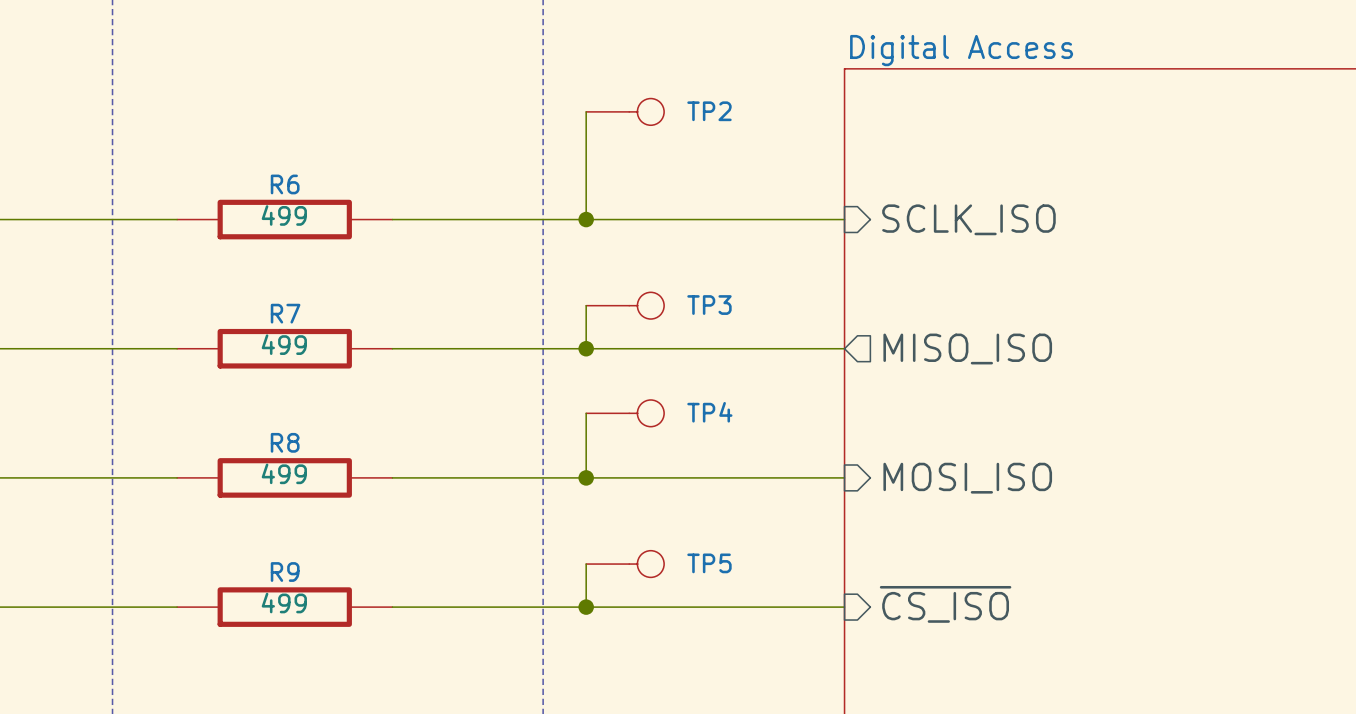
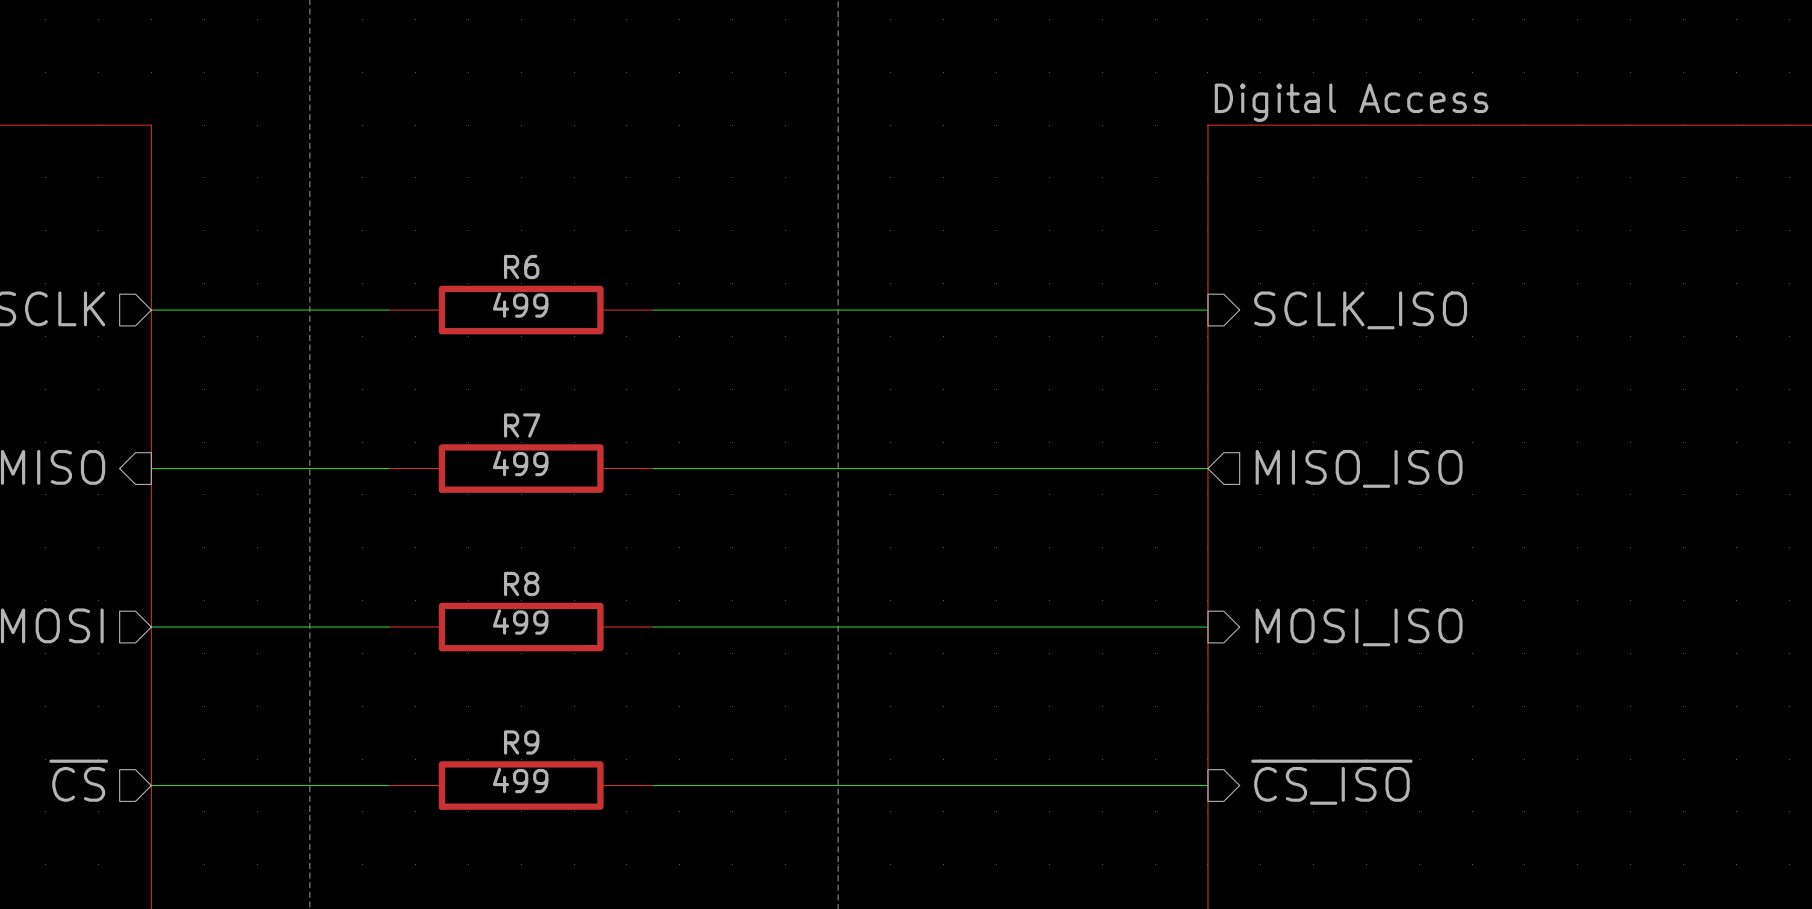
wire: (586, 111) (586, 219) -> none
TP2: (625, 111) -> none
junction: (586, 219) -> none
wire: (586, 305) (586, 348) -> none
TP3: (625, 305) -> none
junction: (586, 348) -> none
wire: (586, 413) (586, 477) -> none
TP4: (625, 413) -> none
junction: (586, 477) -> none
wire: (586, 564) (586, 607) -> none
TP5: (625, 564) -> none
junction: (586, 607) -> none

